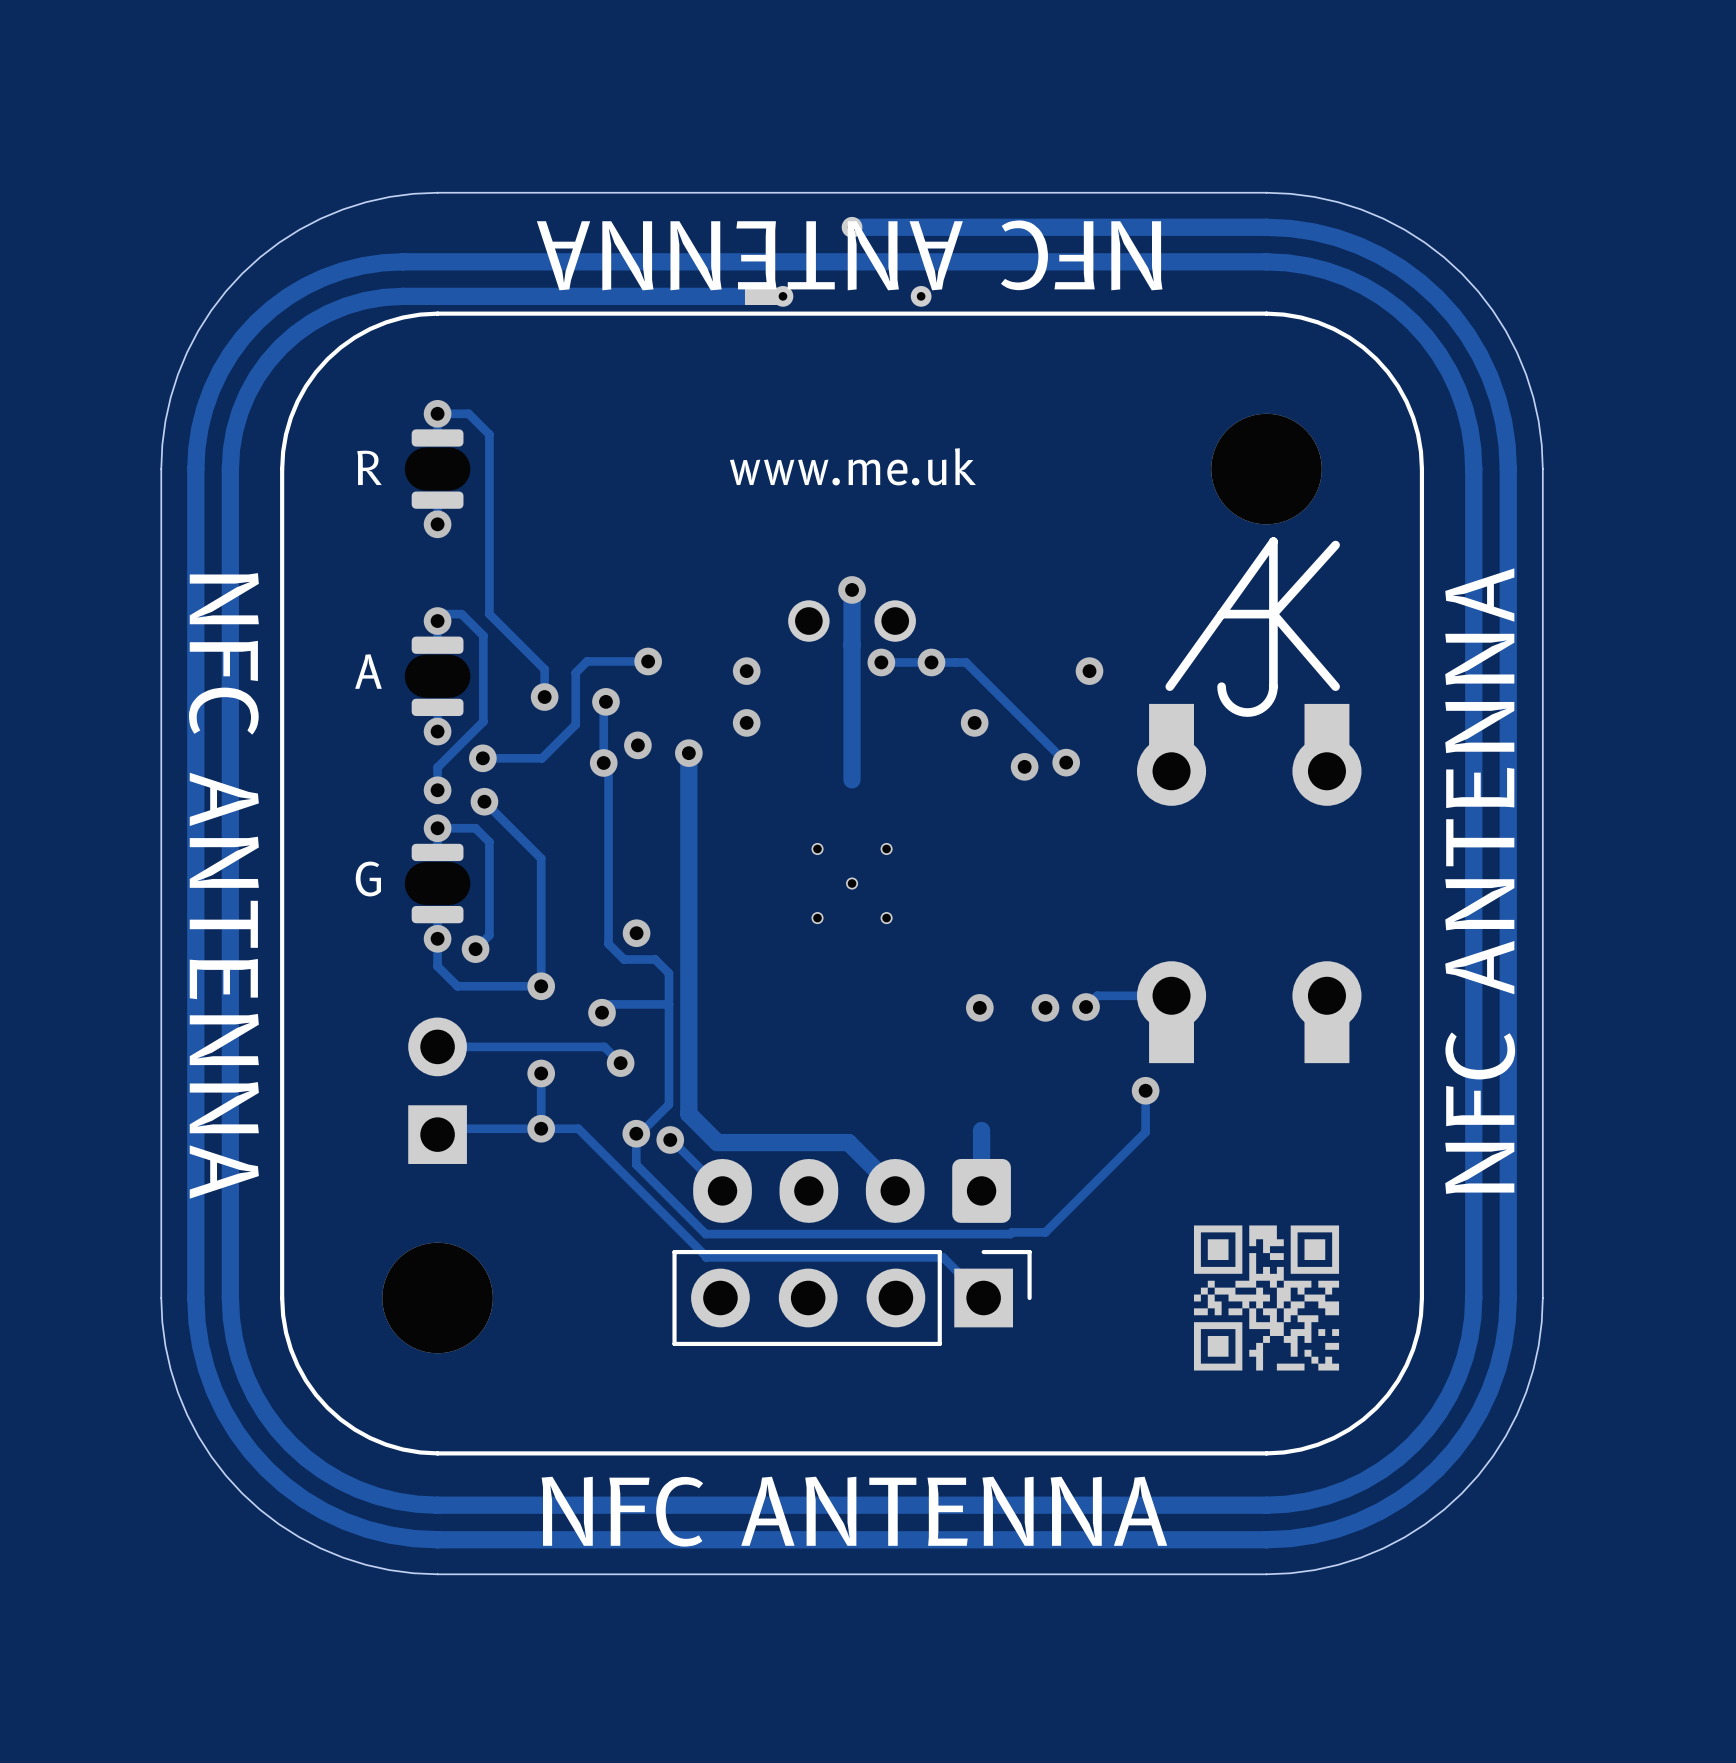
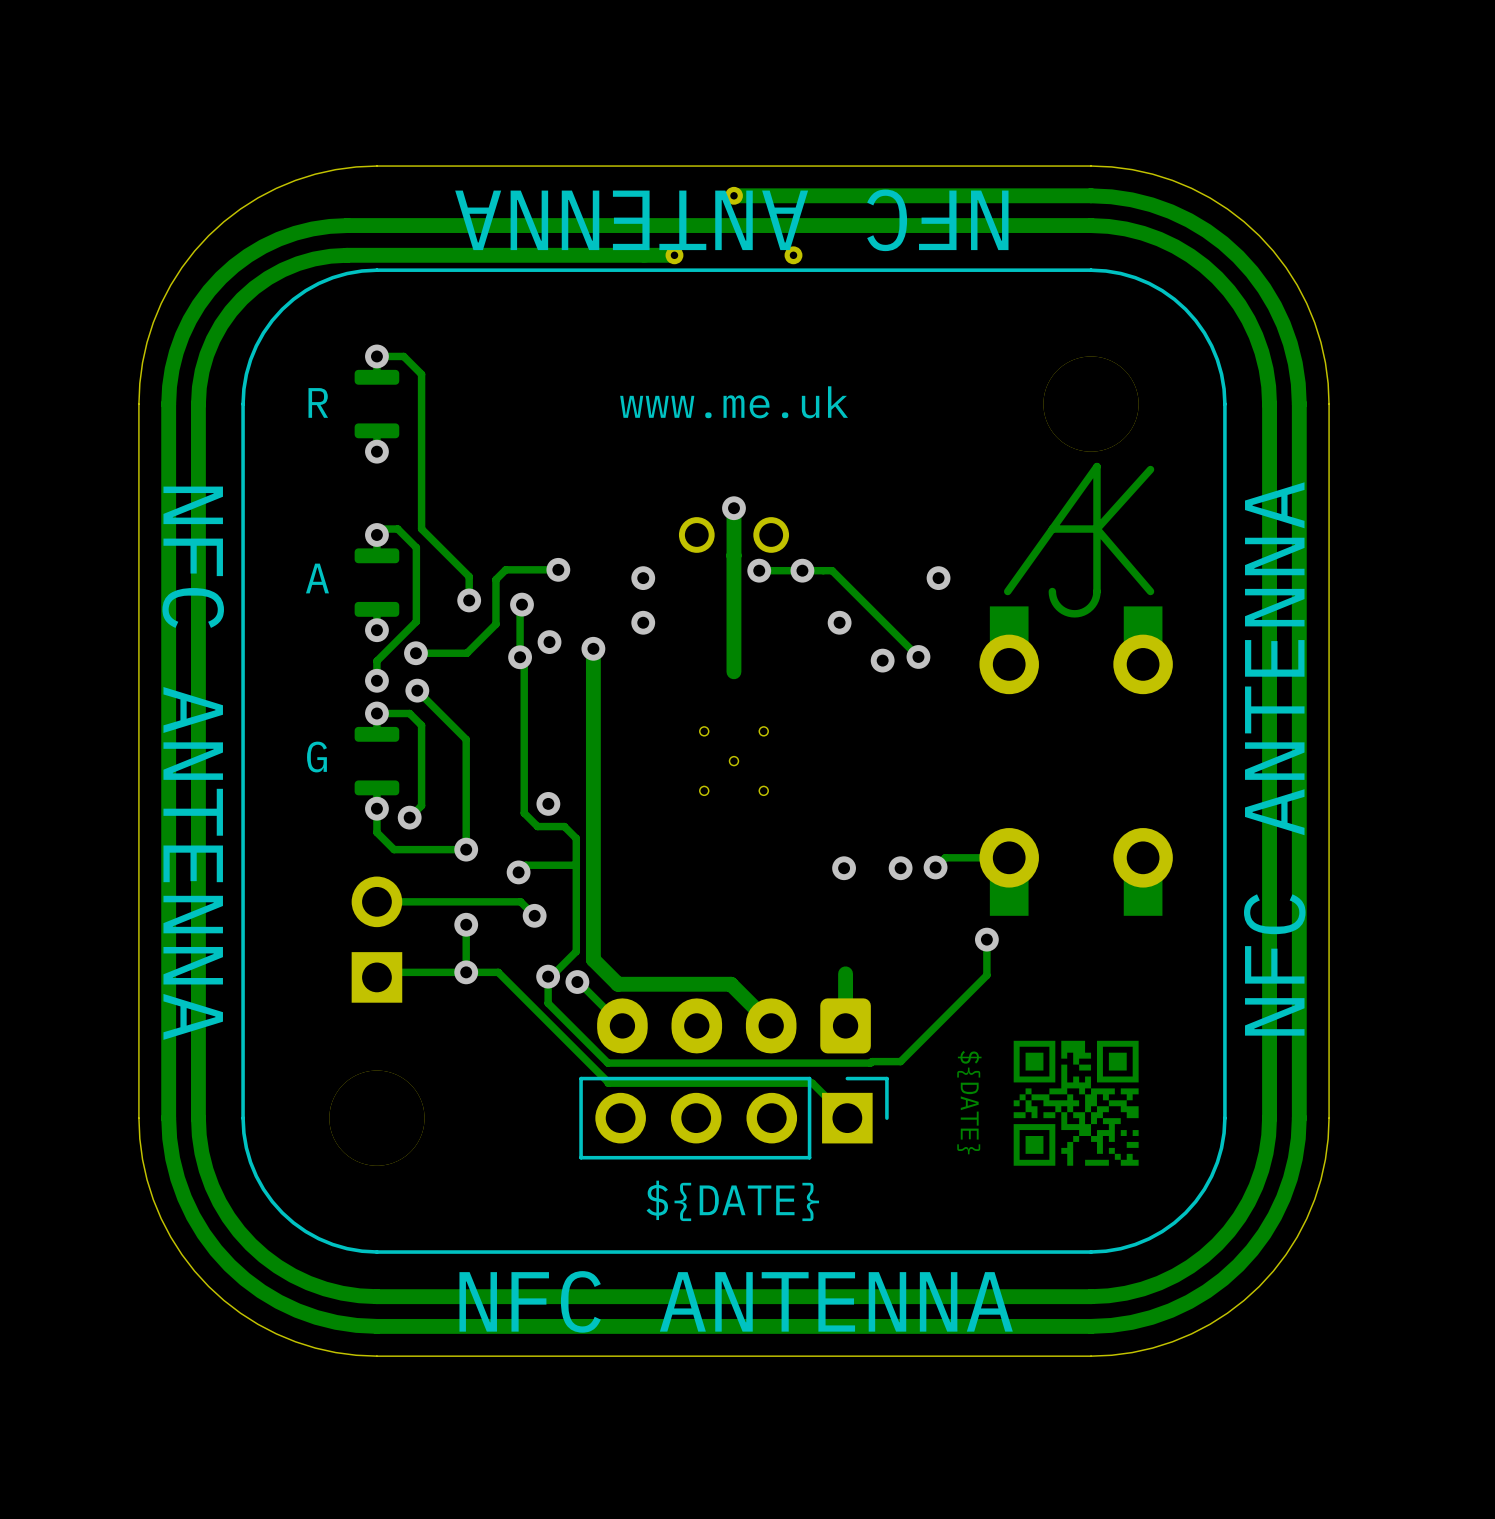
drawing shape: [1165, 537, 1340, 717] -> [1004, 462, 1155, 618]
text: none -> ${DATE} (969, 1102)
part position: (1266, 1297) -> (1076, 1103)
text: none -> ${DATE} (732, 1200)

